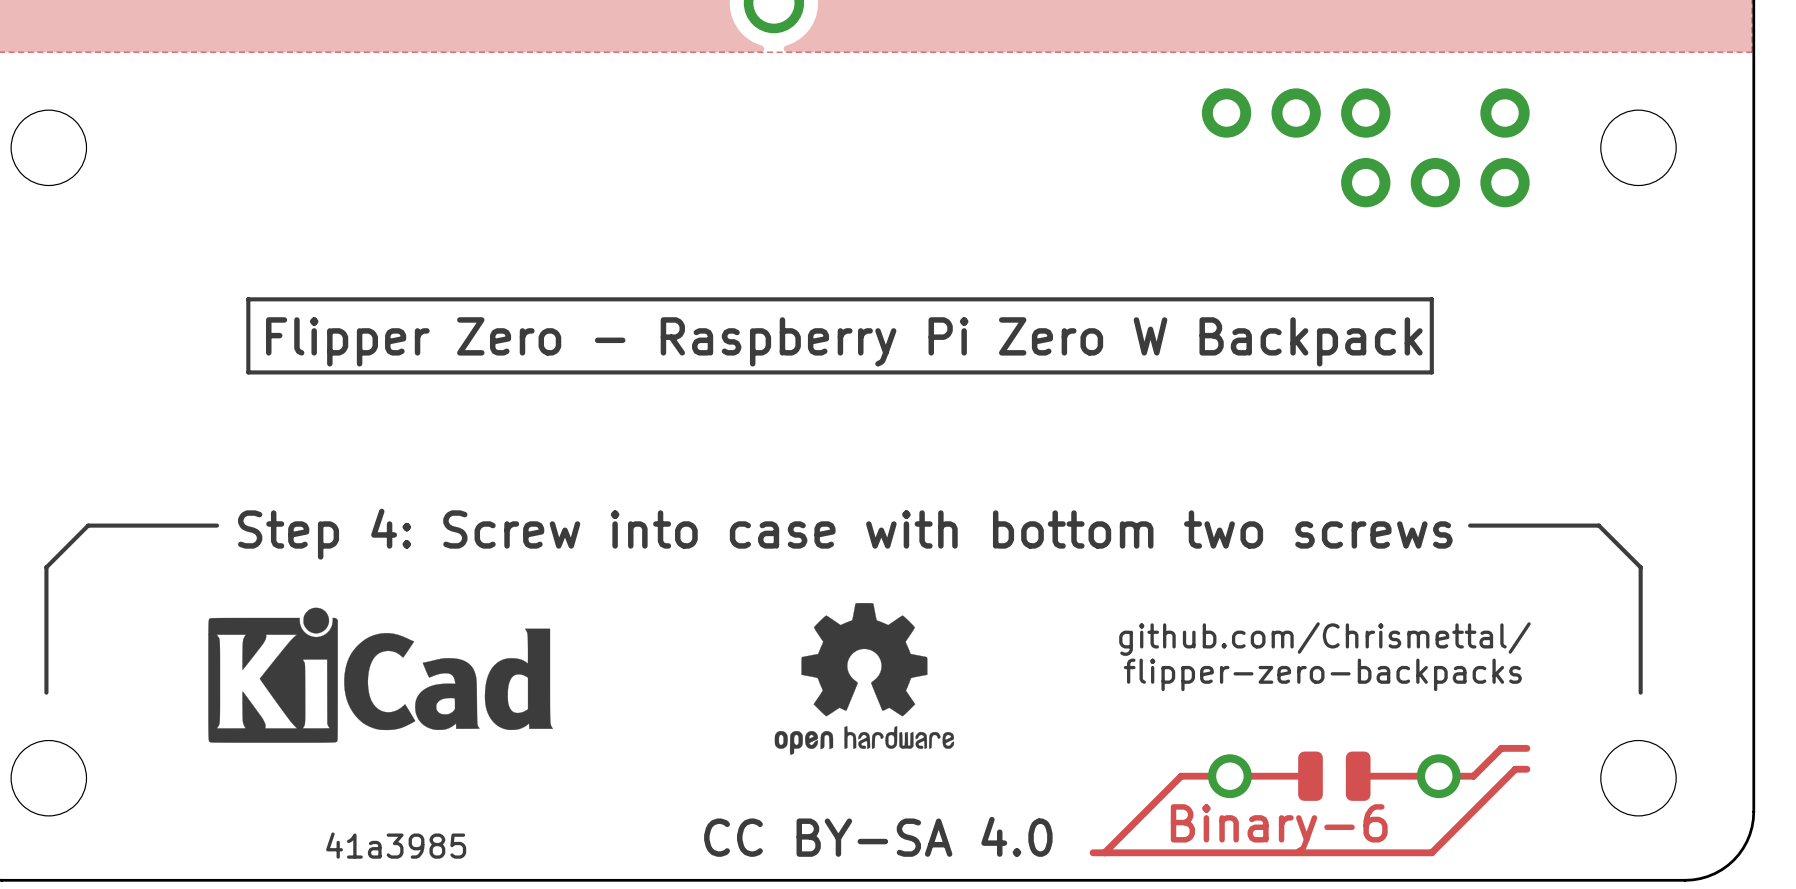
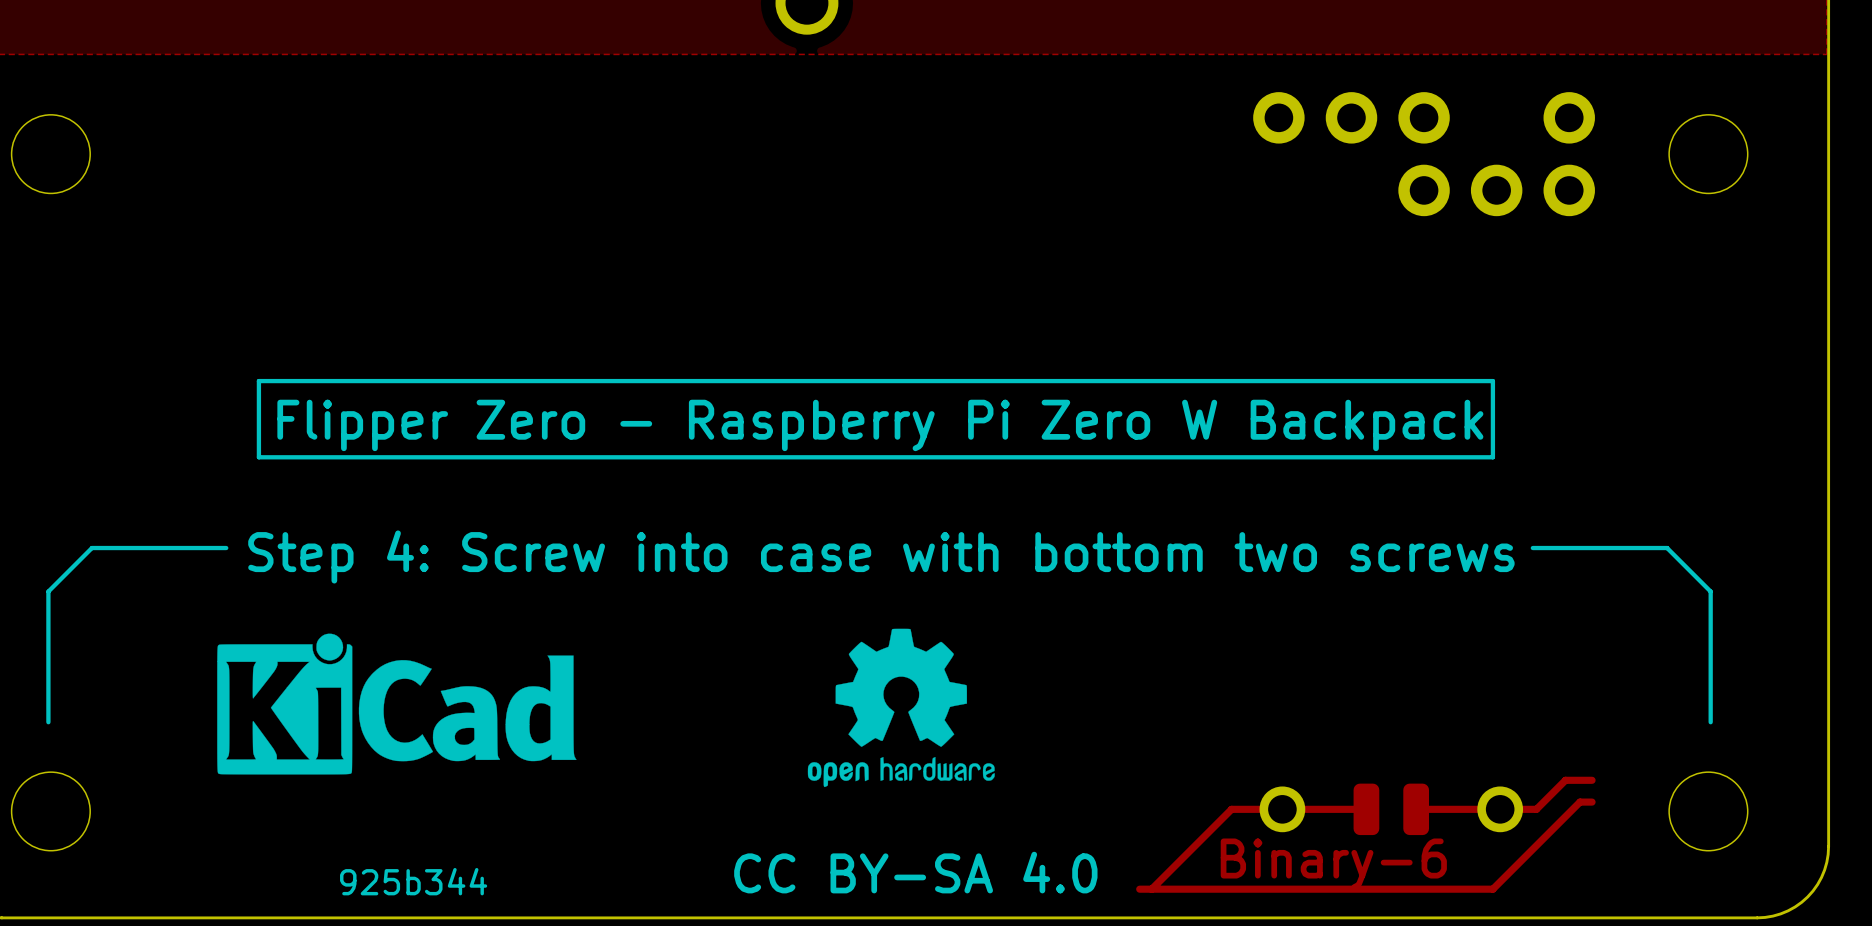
text position: Flipper Zero - Raspberry Pi Zero W Backpack (844, 341) -> Flipper Zero - Raspberry Pi Zero W Backpack (880, 425)
line: (248, 365) (248, 299) (1431, 299) (1431, 365) -> (258, 381) (1492, 381)
line: (248, 372) (1431, 372) -> (258, 388) (258, 457) (1492, 457) (1492, 388)
text: github.com/Chrismettal/ (1324, 639) -> none
text: flipper-zero-backpacks (1322, 674) -> none
text: 41a3985 (396, 845) -> 925b344 (413, 881)

